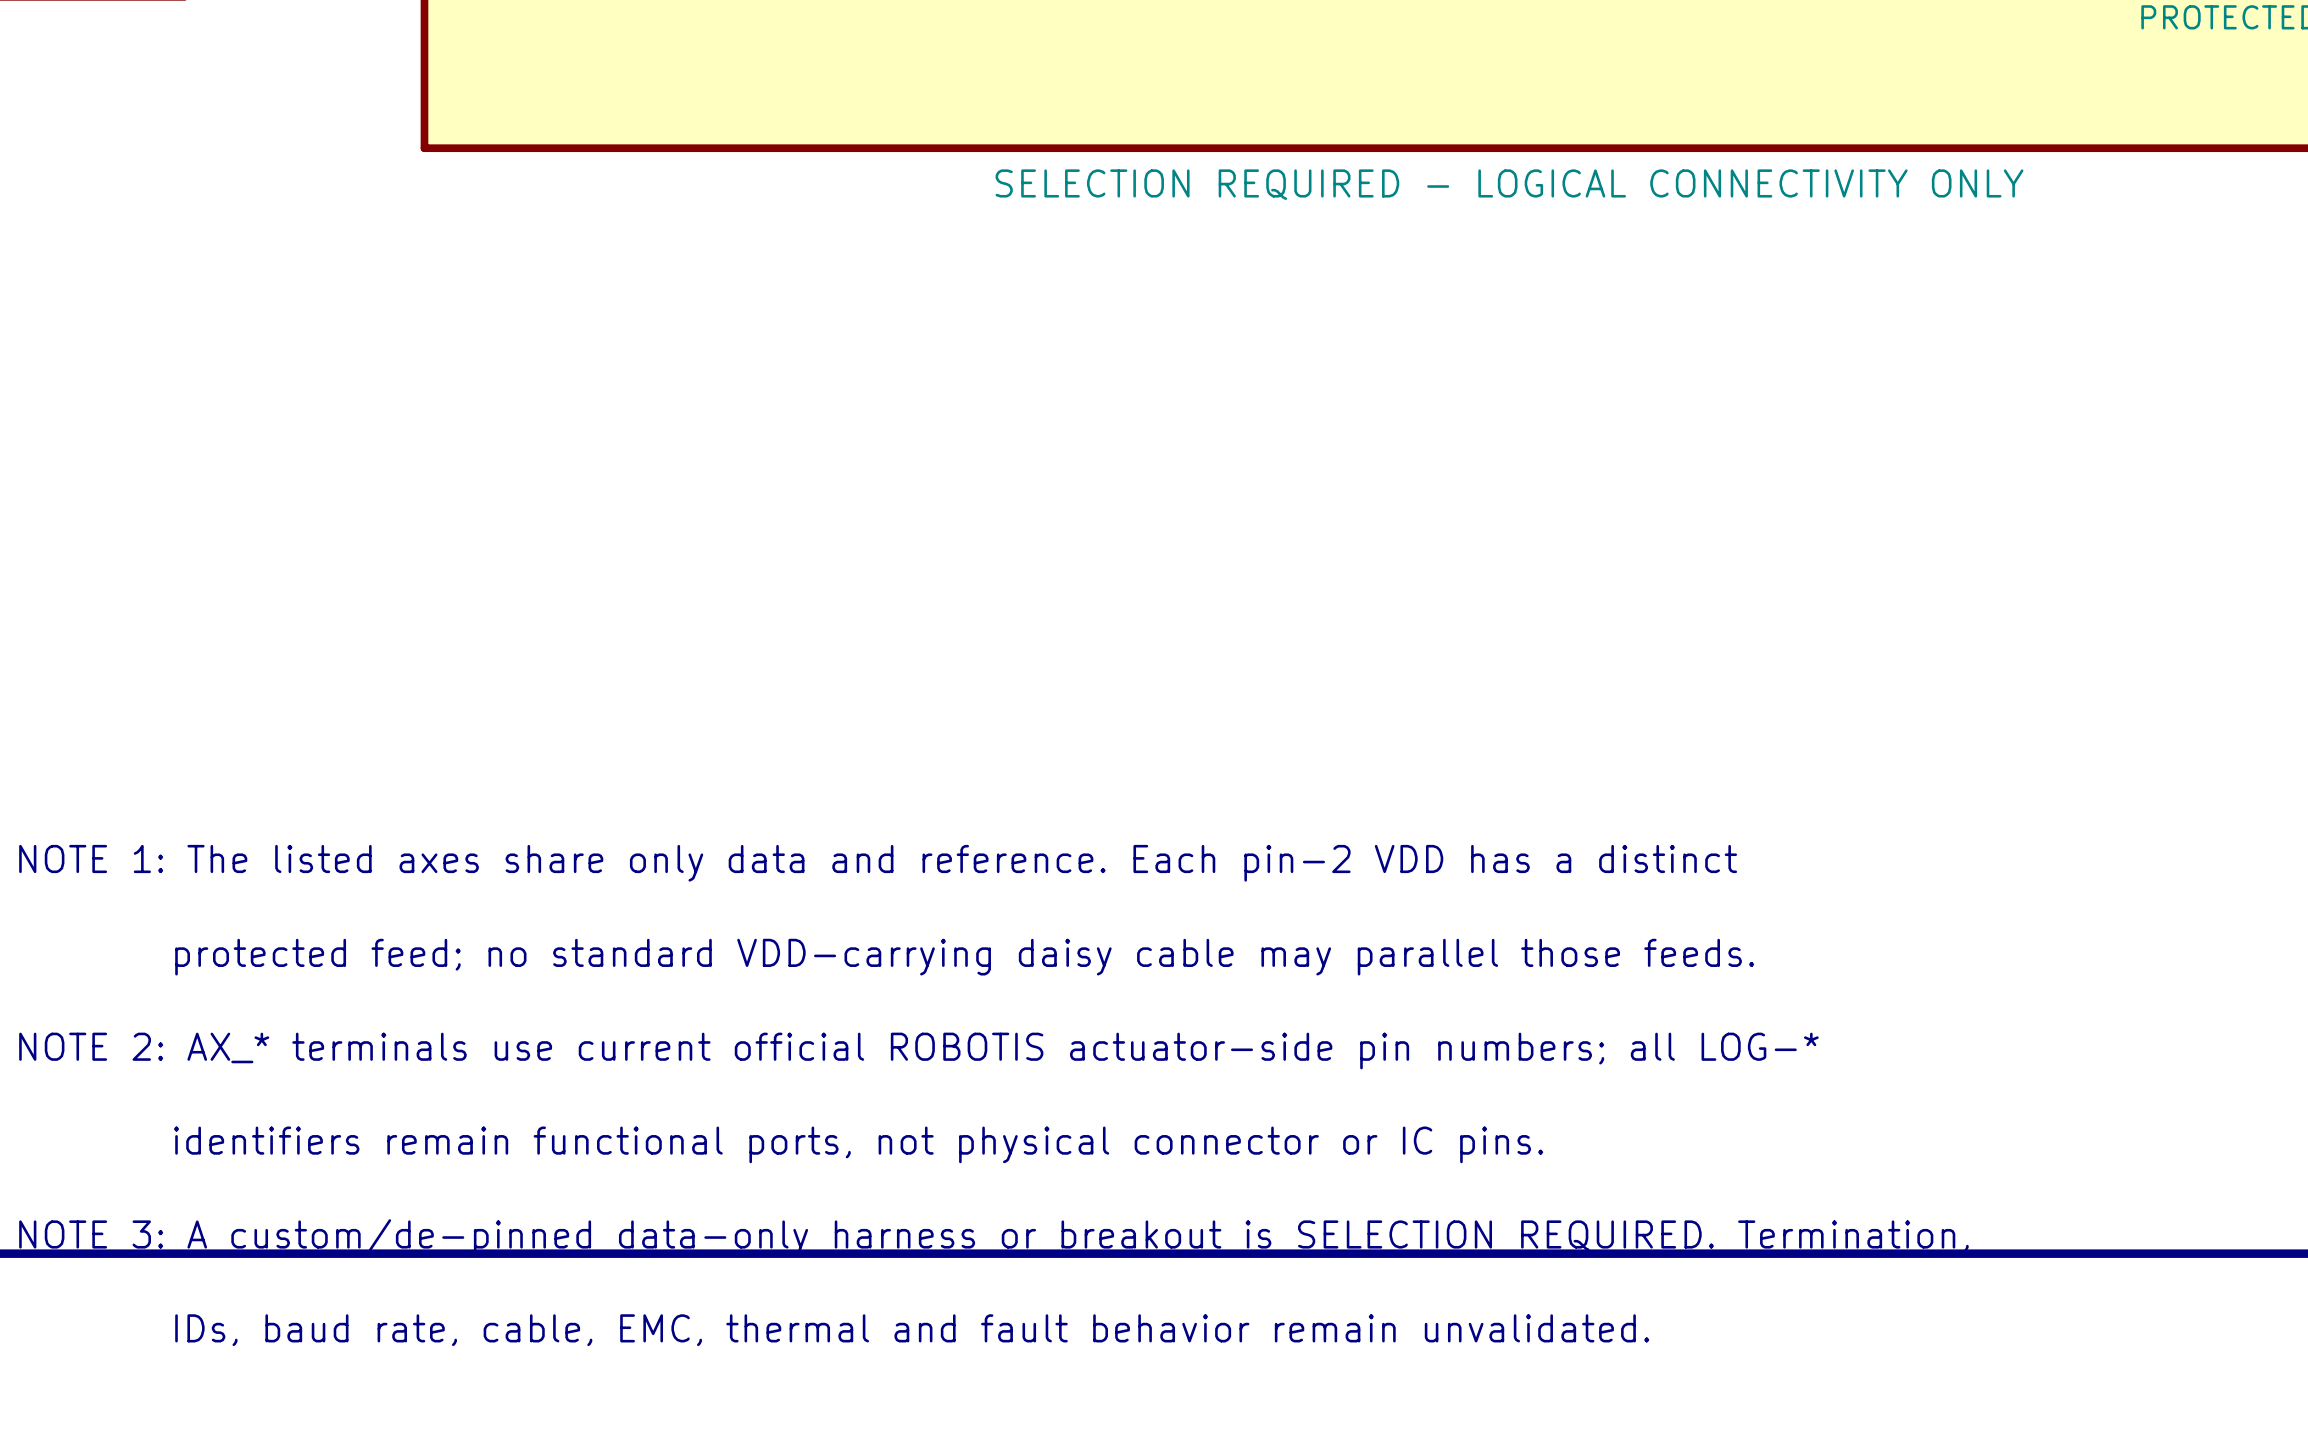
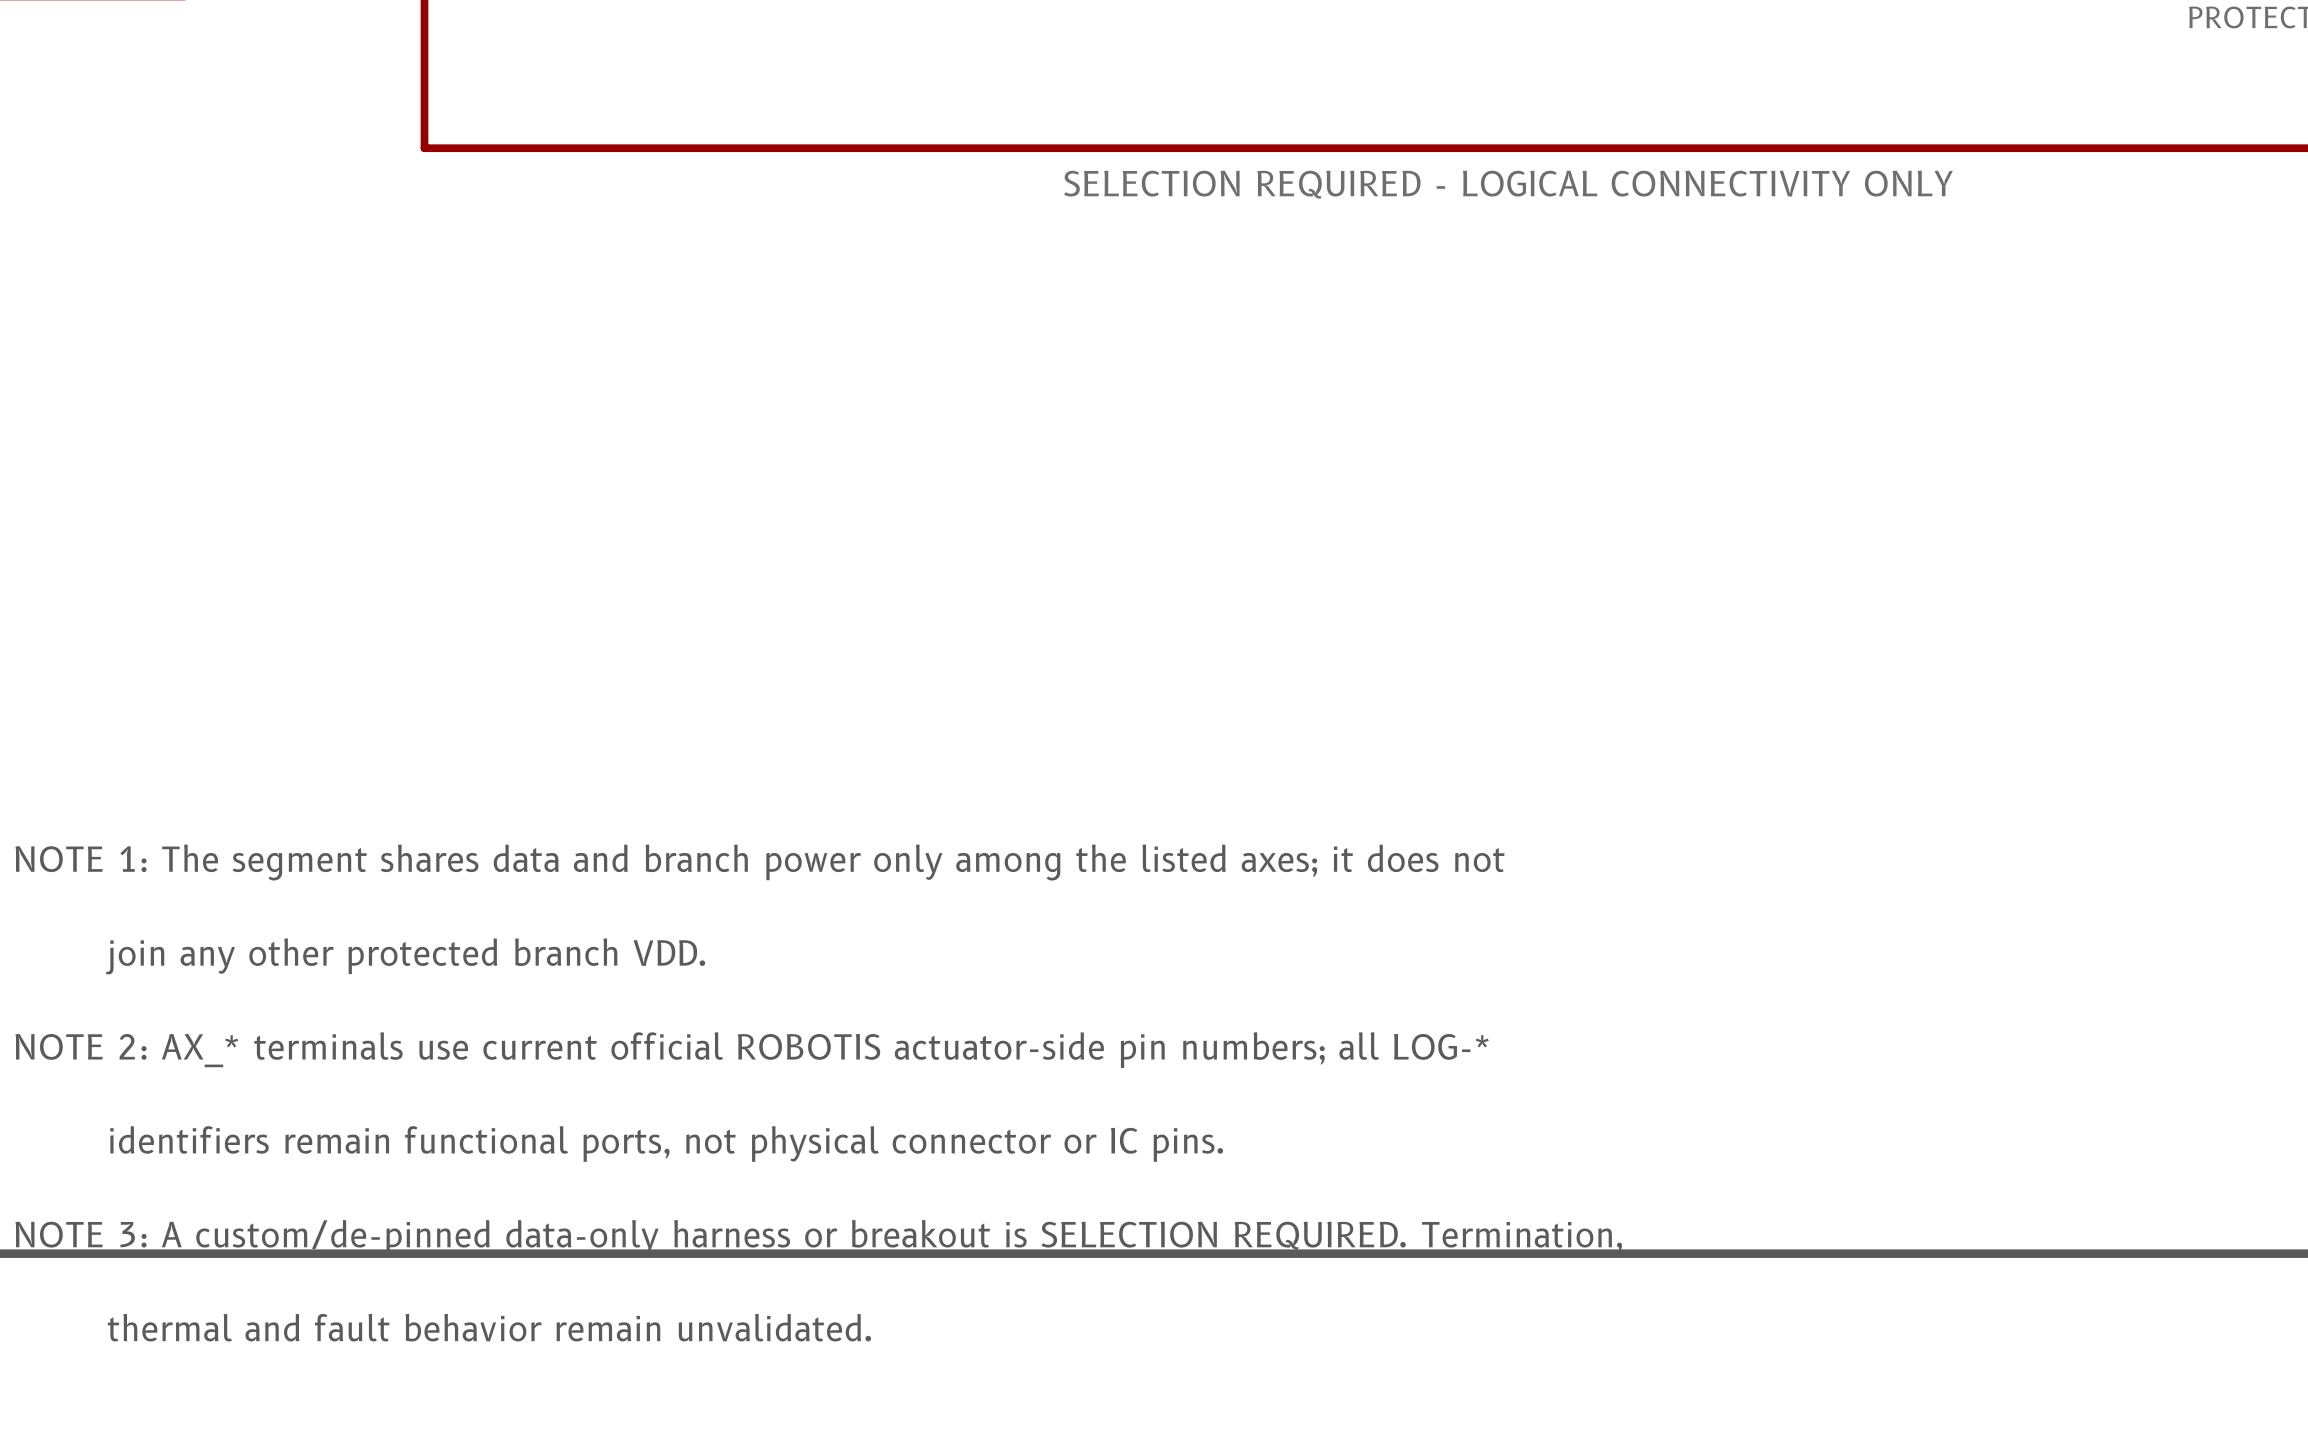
text: NOTE 1: The listed axes share only data and reference. Each pin-2 VDD has a distinct (878, 863) -> NOTE 1: The segment shares data and branch power only among the listed axes; it does not (760, 862)
text: protected feed; no standard VDD-carrying daisy cable may parallel those feeds. (964, 957) -> join any other protected branch VDD. (405, 956)
text: IDs, baud rate, cable, EMC, thermal and fault behavior remain unvalidated. (912, 1330) -> thermal and fault behavior remain unvalidated. (489, 1327)

